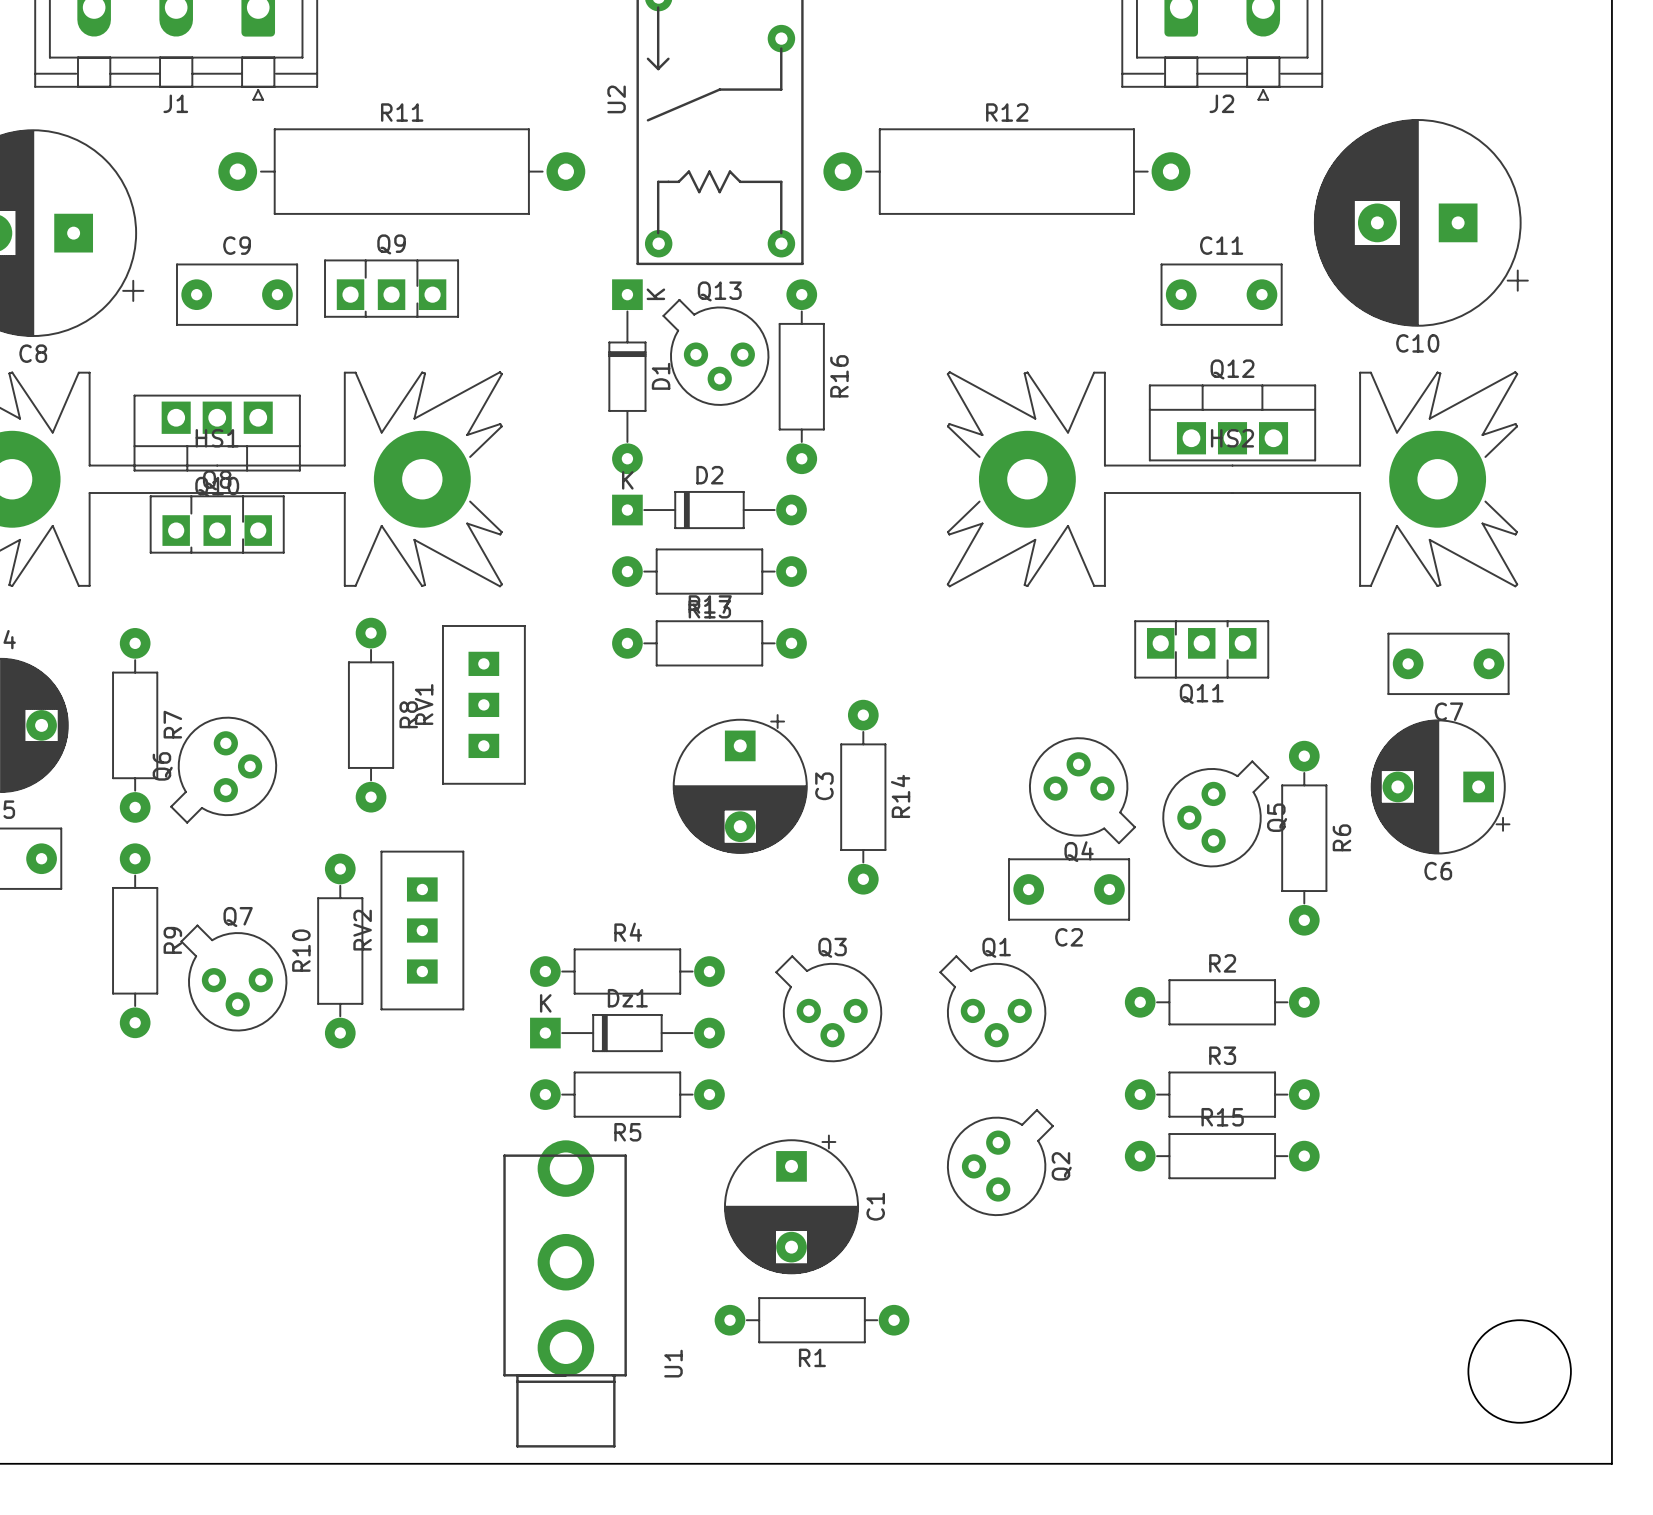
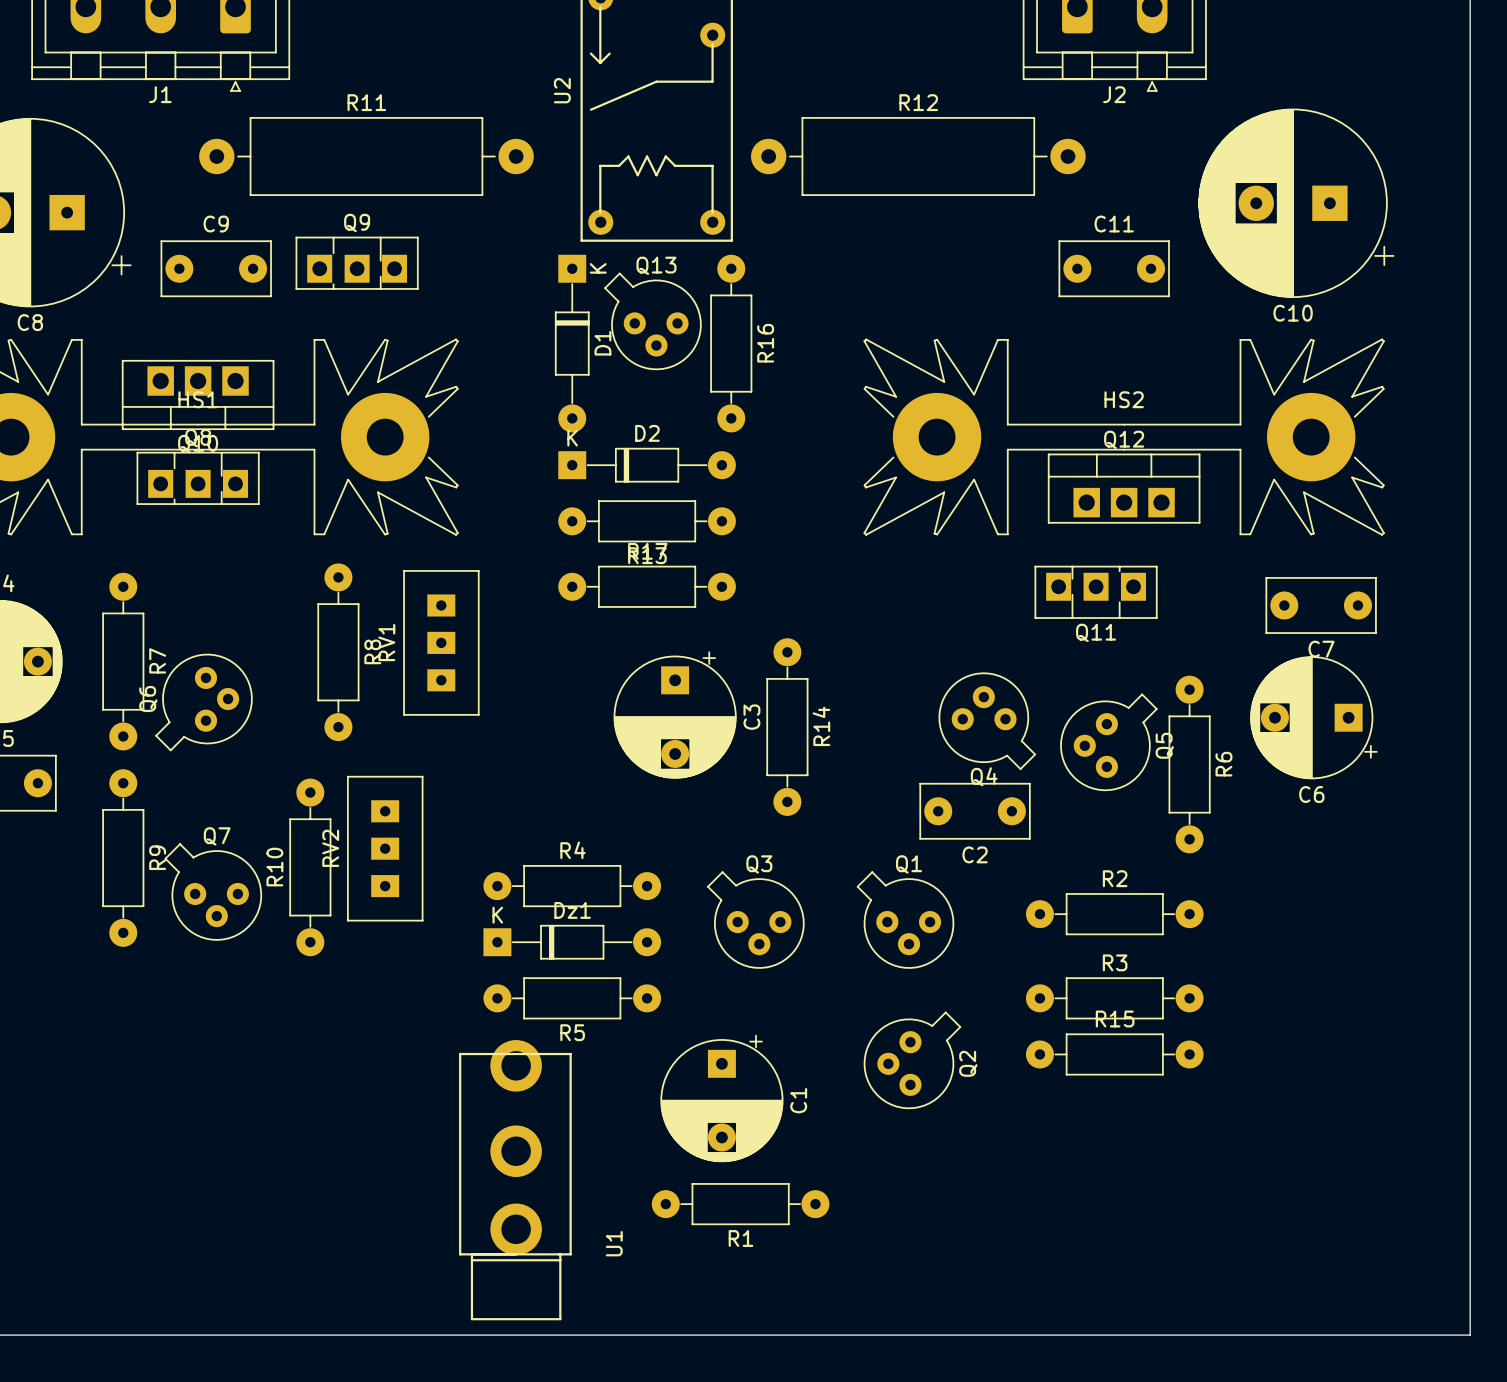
Q12 position: (1232, 422) -> (1124, 488)
round board edge: [1467, 1319, 1572, 1424] -> none

